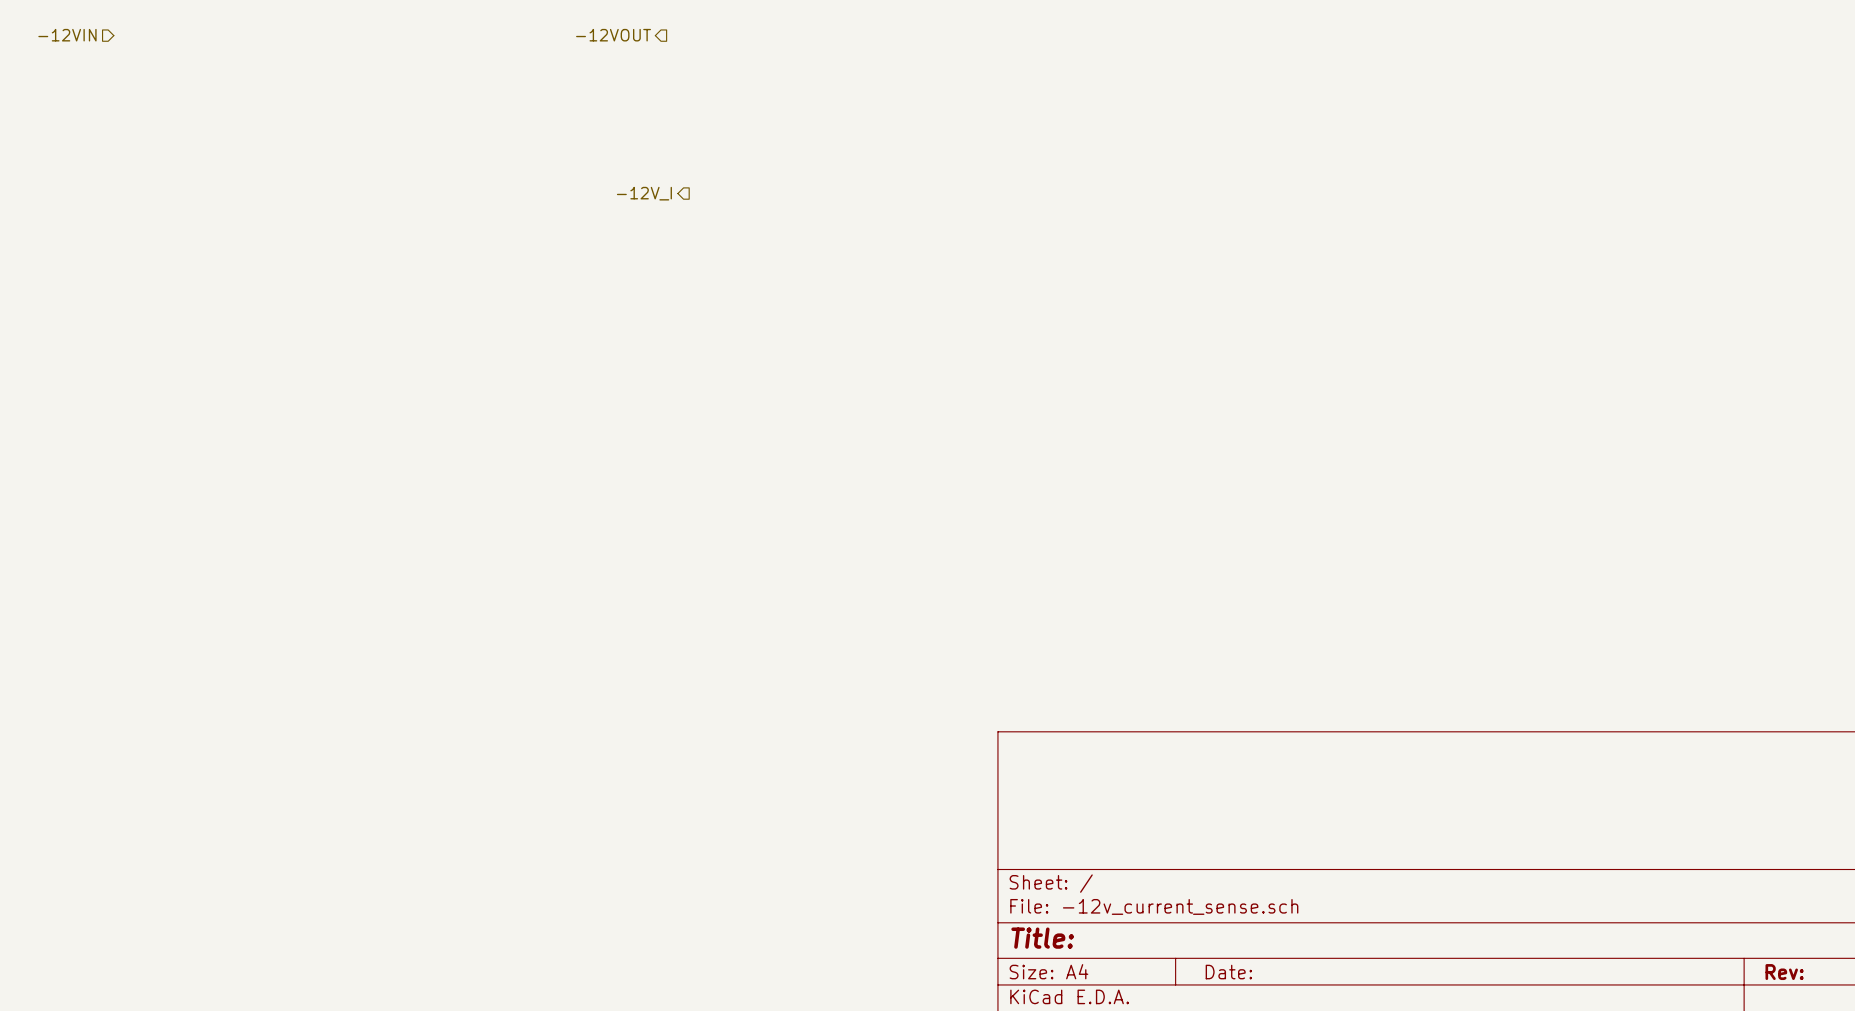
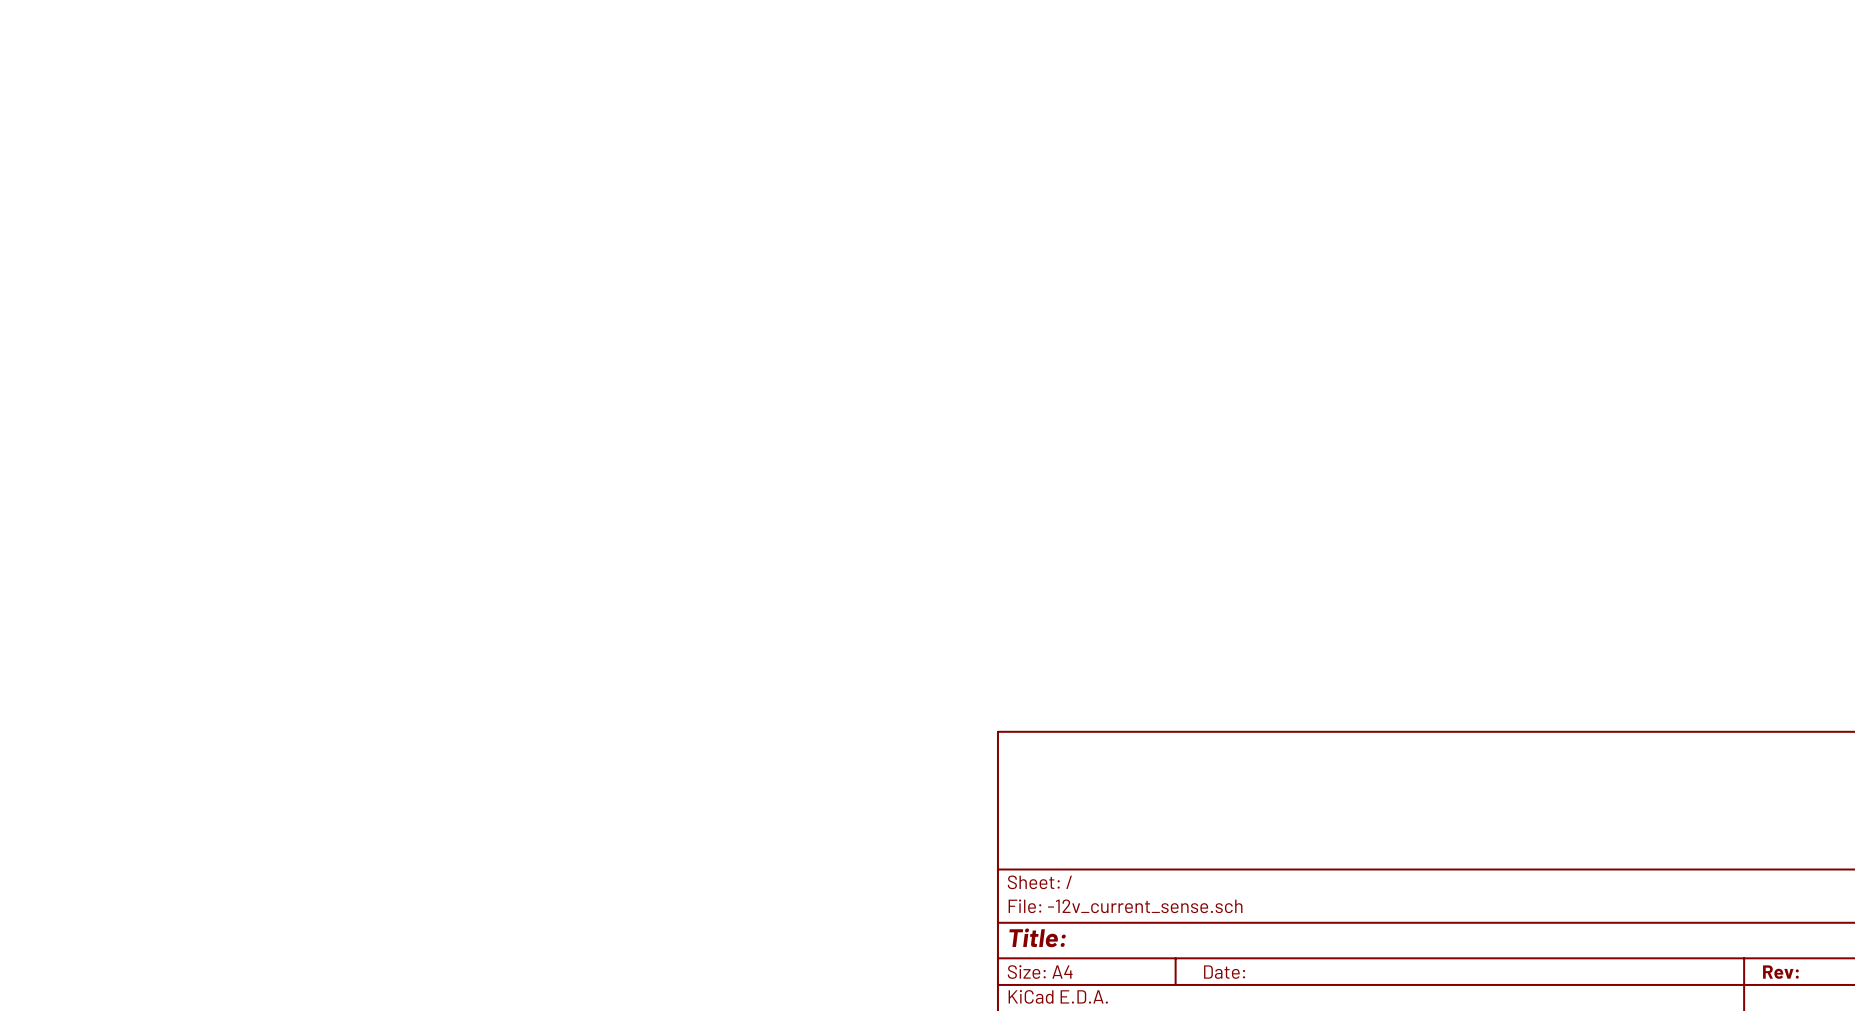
hierarchical label: -12VIN (67, 35) -> none
hierarchical label: -12VOUT (613, 35) -> none
hierarchical label: -12V_I (644, 193) -> none

